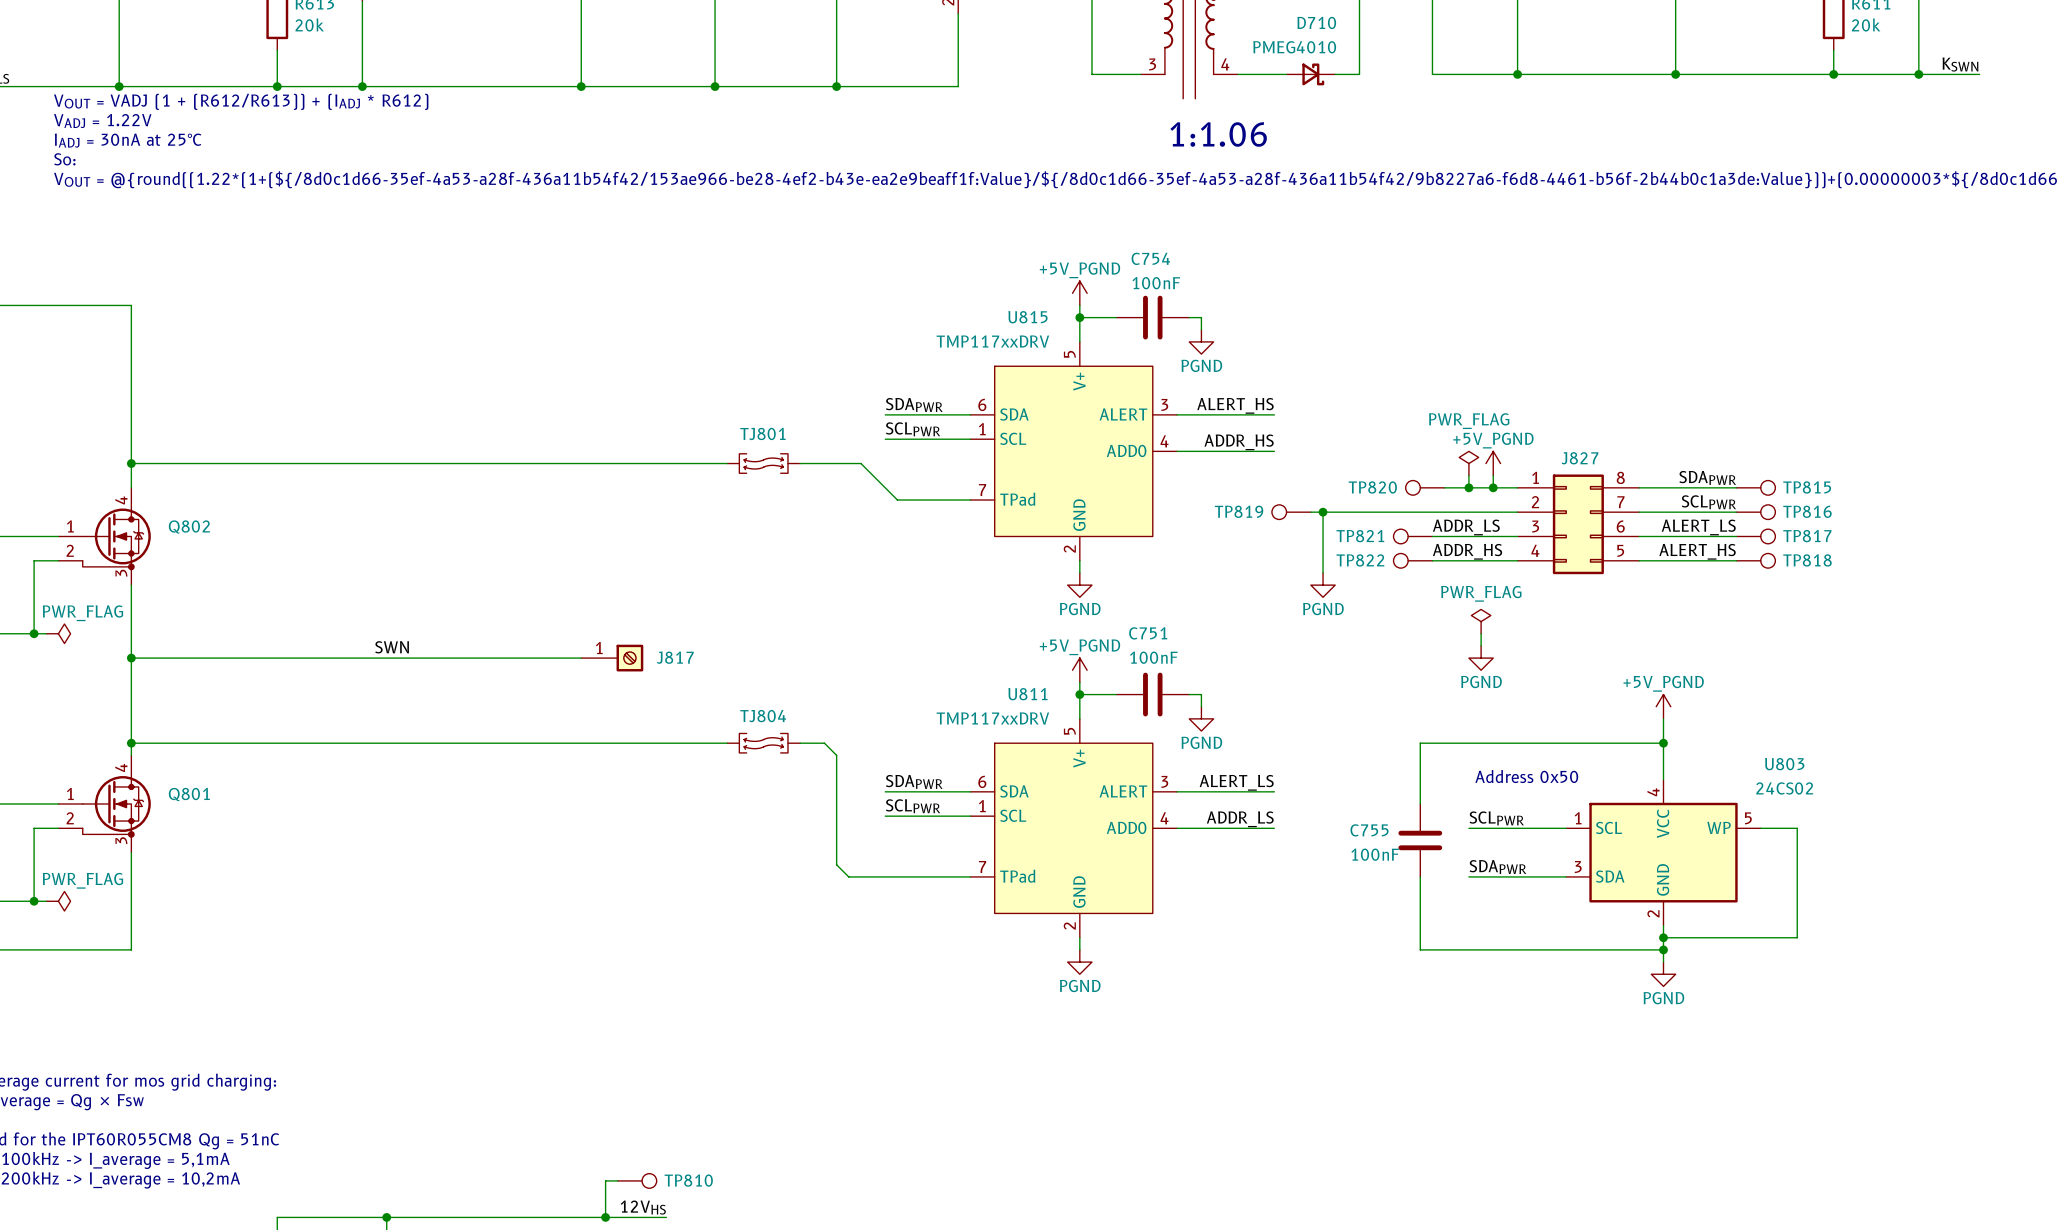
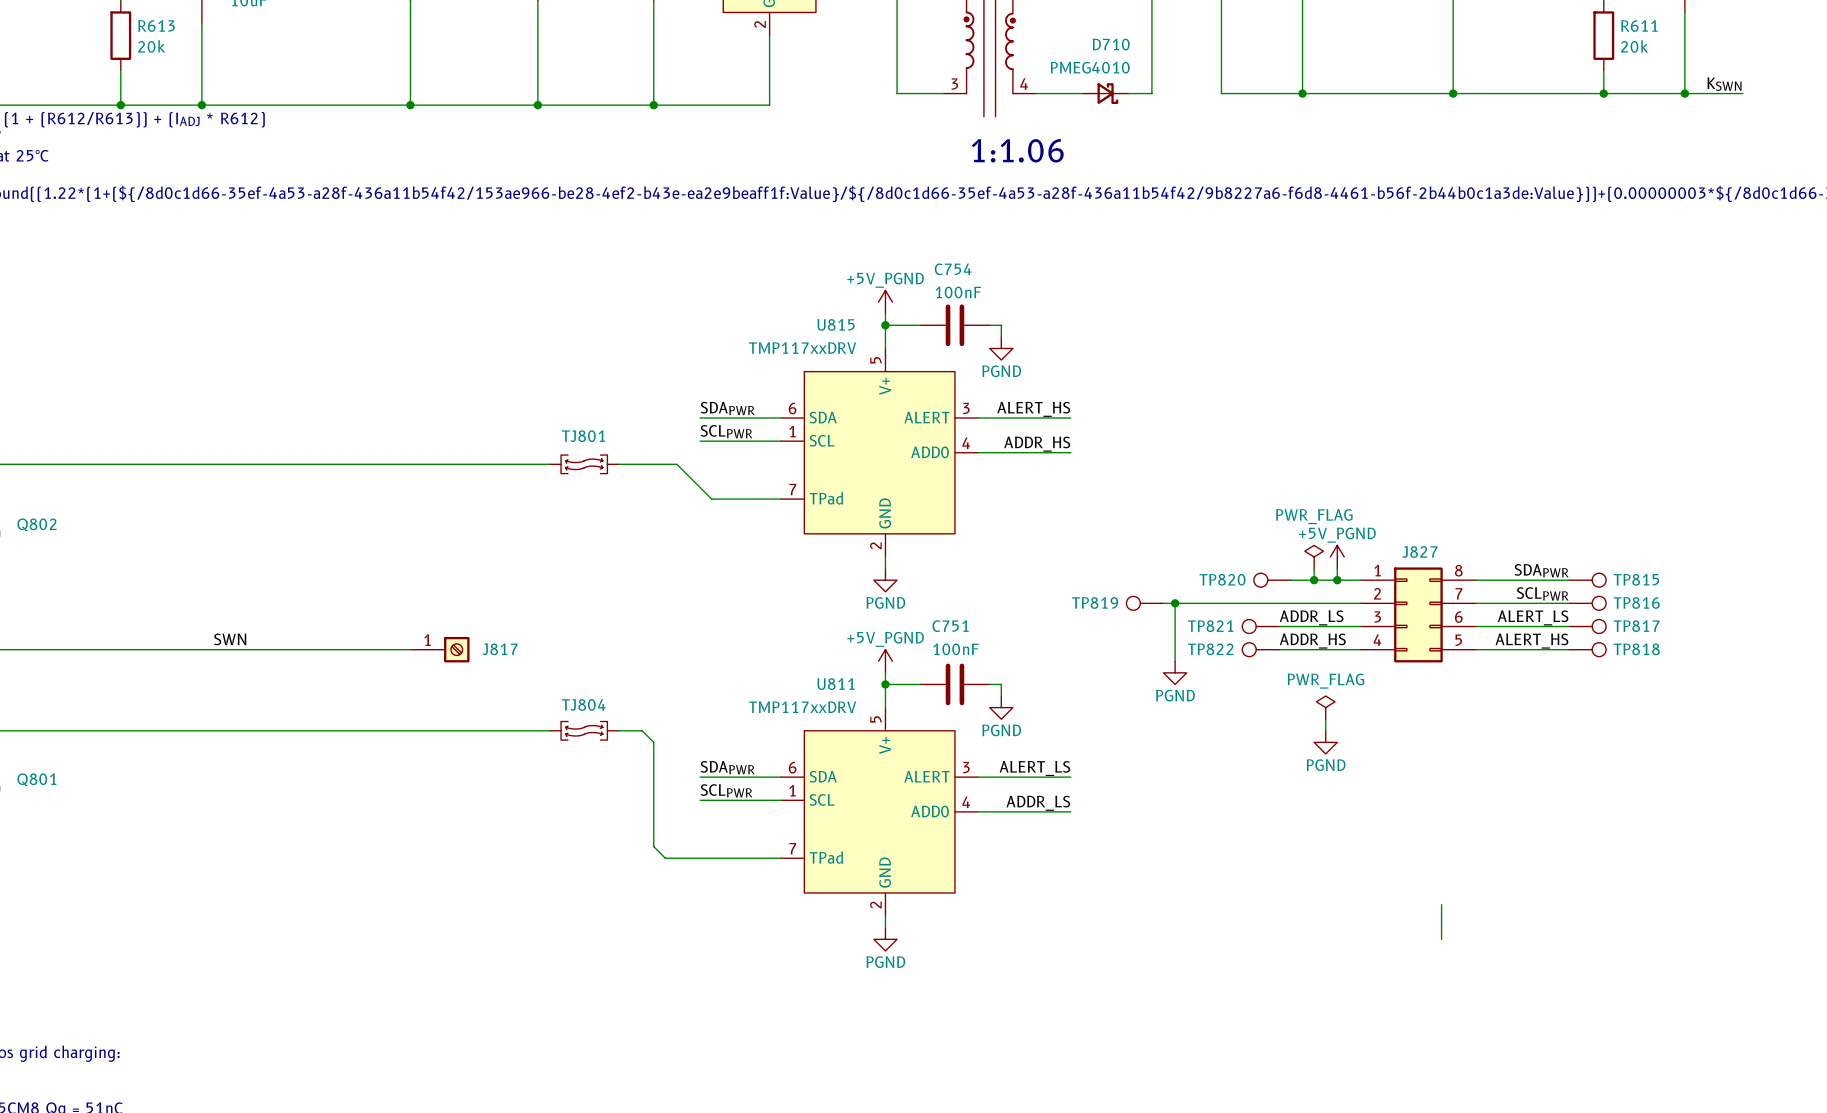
power symbol: PWR_FLAG (1468, 463) -> none
power symbol: +5V_PGND (1493, 463) -> none
wire: (1468, 475) (1468, 487) -> (1314, 568) (1314, 580)
wire: (1493, 475) (1493, 487) -> (1337, 568) (1337, 580)
label position: SDAPWR (1707, 477) -> SDAPWR (1541, 570)
TP820 position: (1425, 487) -> (1272, 580)
wire: (1444, 487) (1517, 487) -> (1290, 580) (1360, 580)
junction: (1468, 487) -> none
junction: (1493, 487) -> none
wire: (1639, 487) (1736, 487) -> (1476, 580) (1569, 580)
TP815 position: (1755, 487) -> (1587, 580)
label position: SCLPWR (1708, 502) -> SCLPWR (1542, 593)
TP819 position: (1291, 512) -> (1144, 603)
wire: (1310, 512) (1517, 512) -> (1163, 603) (1360, 603)
wire: (1323, 512) (1323, 572) -> (1175, 603) (1175, 661)
junction: (1323, 512) -> none
wire: (1639, 512) (1736, 512) -> (1476, 603) (1569, 603)
TP816 position: (1755, 512) -> (1587, 603)
J827 position: (1578, 524) -> (1418, 614)
label position: ADDR_LS (1466, 527) -> ADDR_LS (1311, 617)
label position: ALERT_LS (1698, 527) -> ALERT_LS (1533, 617)
TP821 position: (1413, 536) -> (1260, 626)
wire: (1432, 536) (1517, 536) -> (1279, 626) (1360, 626)
wire: (1639, 536) (1736, 536) -> (1476, 626) (1569, 626)
TP817 position: (1755, 536) -> (1587, 626)
label position: ADDR_HS (1467, 551) -> ADDR_HS (1312, 641)
label position: ALERT_HS (1697, 551) -> ALERT_HS (1531, 641)
TP822 position: (1413, 560) -> (1260, 649)
wire: (1432, 560) (1517, 560) -> (1279, 649) (1360, 649)
power symbol: none -> PWR_FLAG (1314, 557)
power symbol: none -> +5V_PGND (1337, 557)
wire: (1639, 560) (1736, 560) -> (1476, 649) (1569, 649)
TP818 position: (1755, 560) -> (1587, 649)
power symbol: PGND (1323, 585) -> none
junction: none -> (1314, 580)
junction: none -> (1337, 580)
junction: none -> (1175, 603)
power symbol: PWR_FLAG (1481, 621) -> none
wire: (1481, 633) (1481, 645) -> (1325, 719) (1325, 730)
power symbol: PGND (1481, 658) -> none
power symbol: none -> PGND (1175, 672)
power symbol: +5V_PGND (1663, 706) -> none
power symbol: none -> PWR_FLAG (1325, 707)
wire: (1663, 718) (1663, 779) -> none
wire: (1663, 743) (1420, 743) (1420, 804) -> none
junction: (1663, 743) -> none
power symbol: none -> PGND (1325, 742)
text: Address 0x50 (1526, 776) -> none
label: SCLPWR (1496, 818) -> none
wire: (1468, 828) (1566, 828) -> none
wire: (1760, 828) (1797, 828) (1797, 937) (1663, 937) -> none
C755: 100nF (1420, 840) -> none
U803: 24CS02 (1663, 852) -> none
label: SDAPWR (1497, 867) -> none
wire: (1420, 876) (1420, 949) (1663, 949) -> none
wire: (1468, 876) (1566, 876) -> none
junction: (1663, 937) -> none
junction: (1663, 949) -> none
power symbol: PGND (1663, 974) -> none

